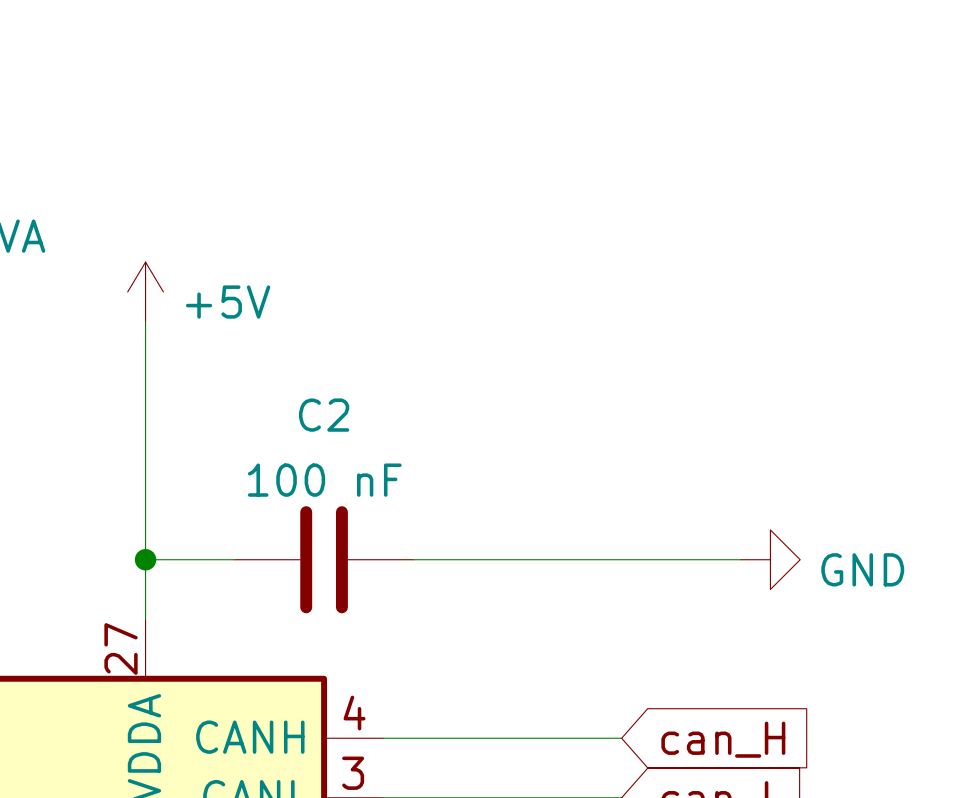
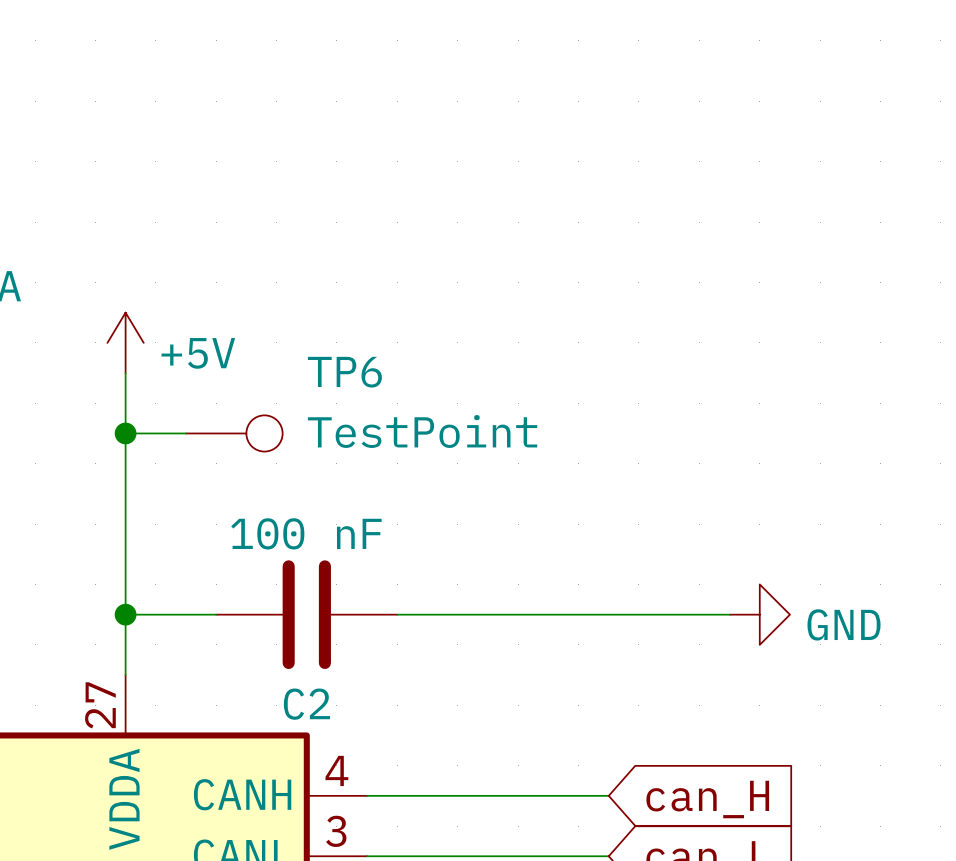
wire: none -> (125, 433) (186, 433)
junction: none -> (125, 433)
TP6: none -> TestPoint (234, 433)
C2 name position: C2 (324, 415) -> C2 (306, 704)

